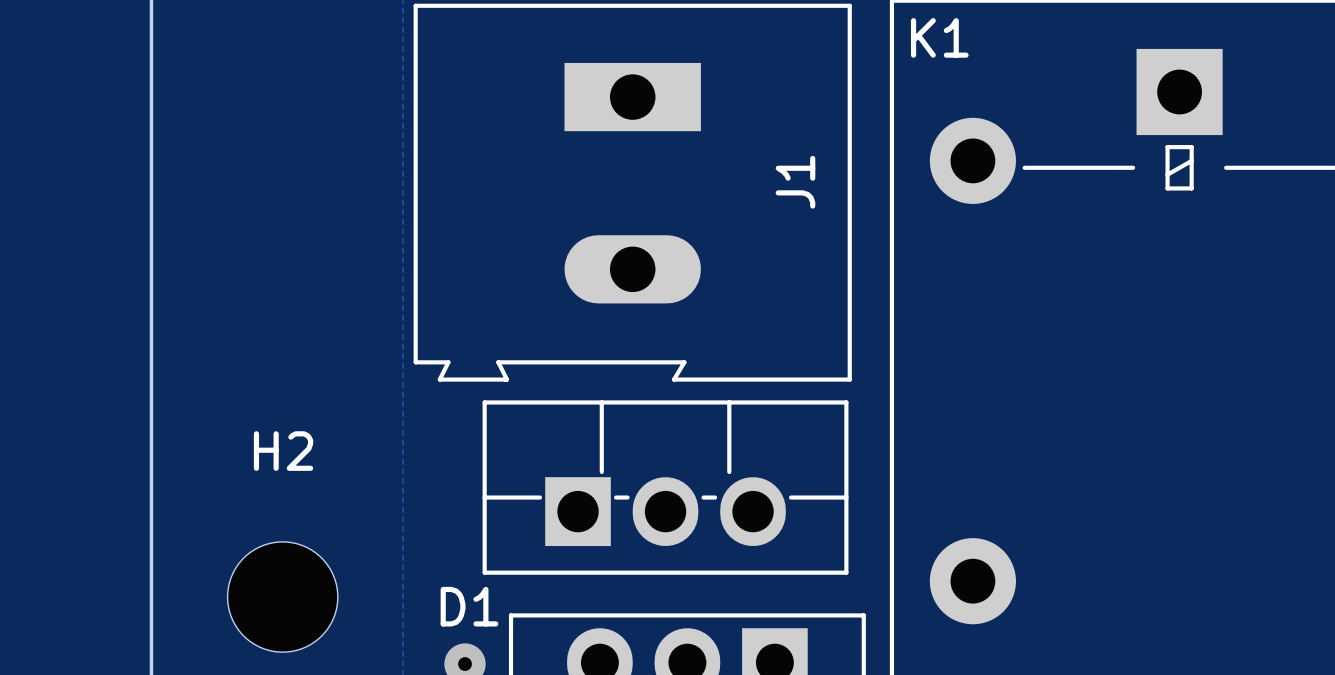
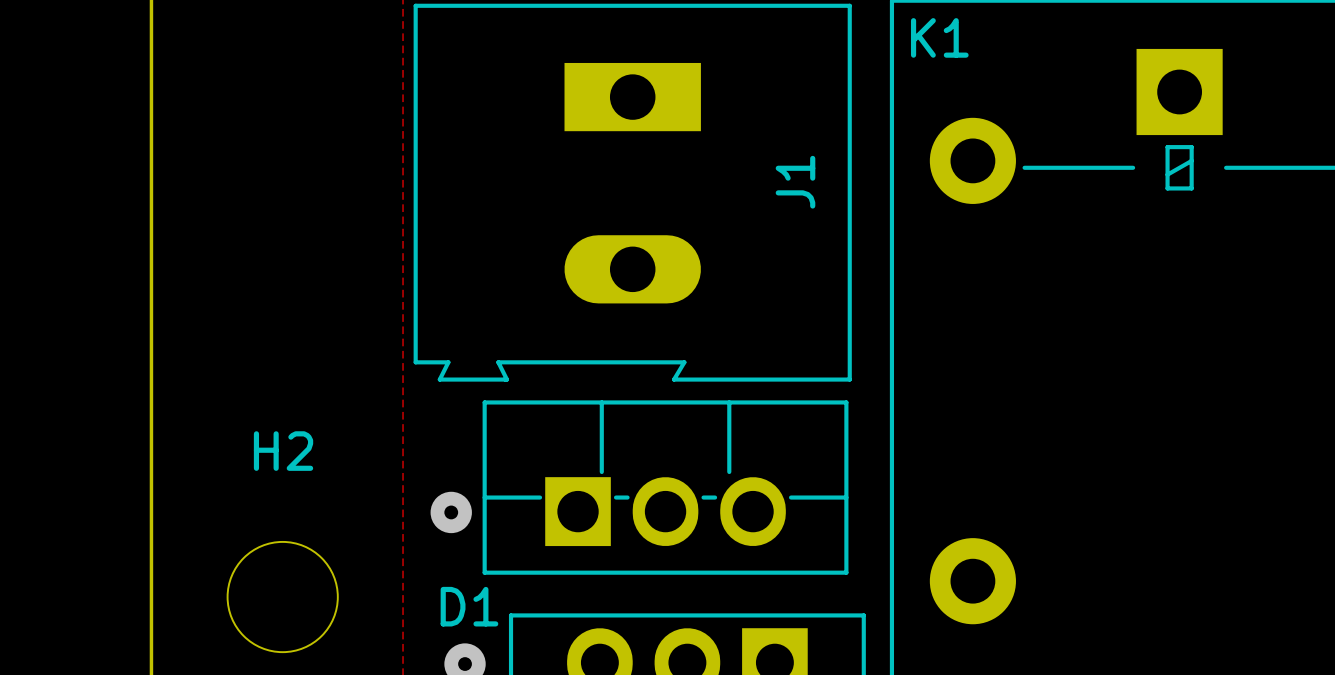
via: none -> (451, 512)

